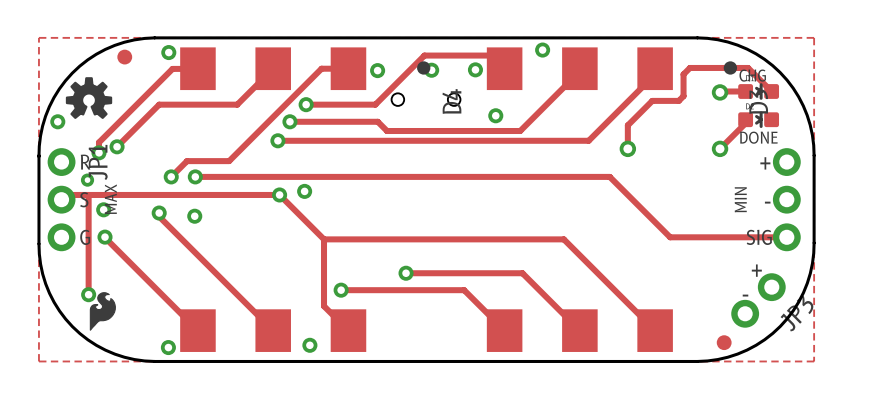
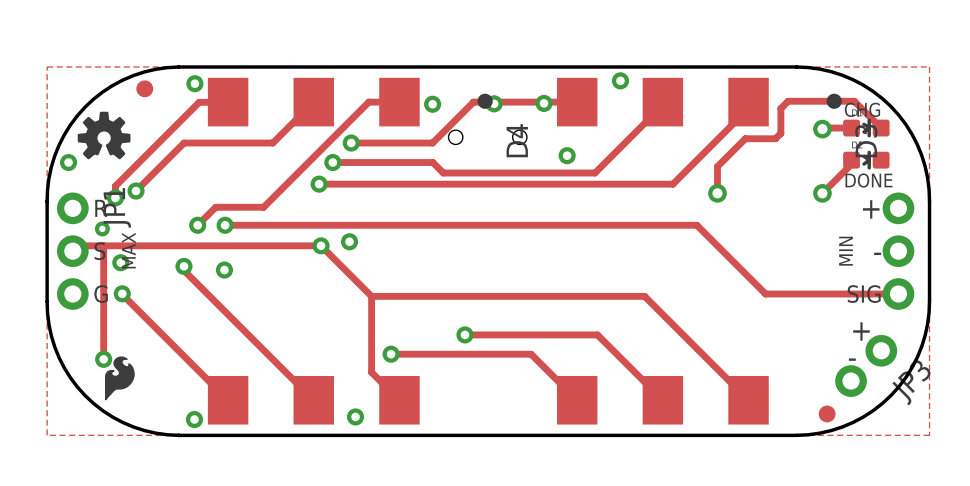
track: (501, 65) (504, 68) (492, 55) (424, 55) (375, 104) -> (577, 102) (473, 102) (432, 143) (430, 143)

